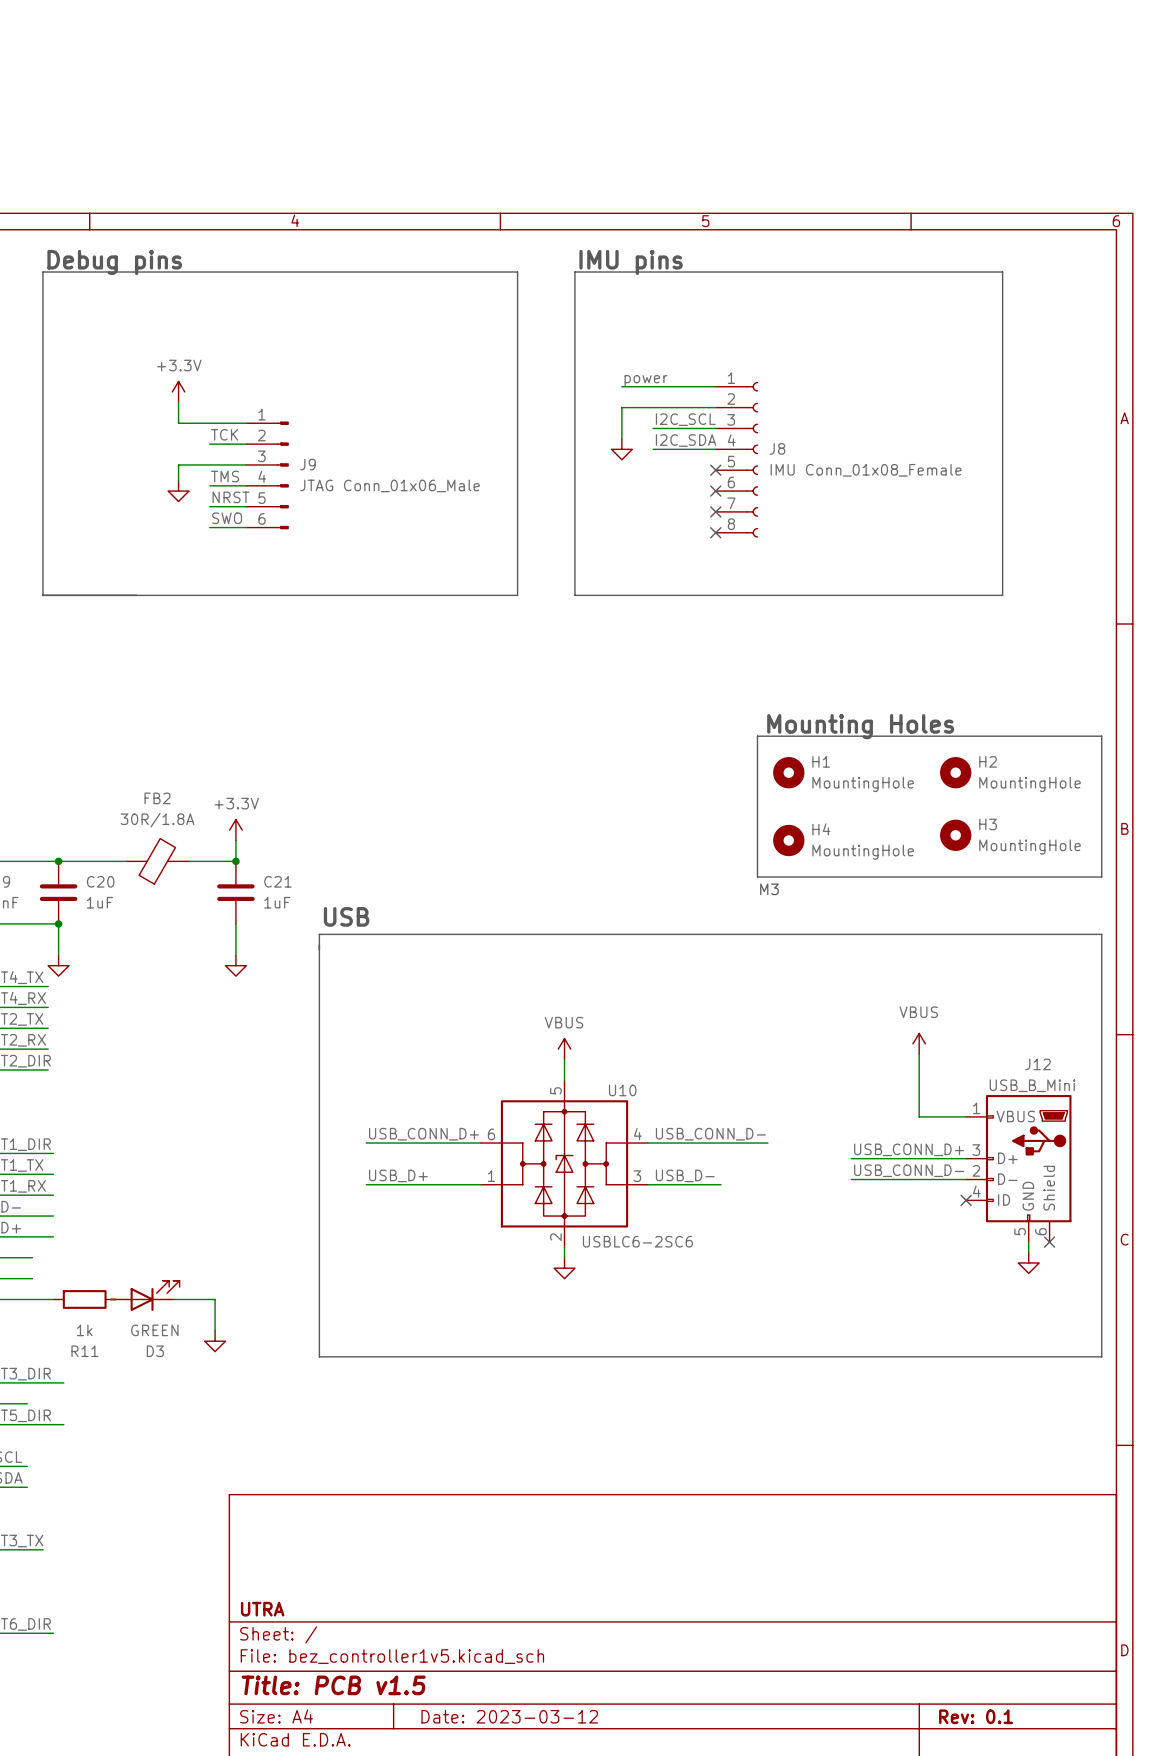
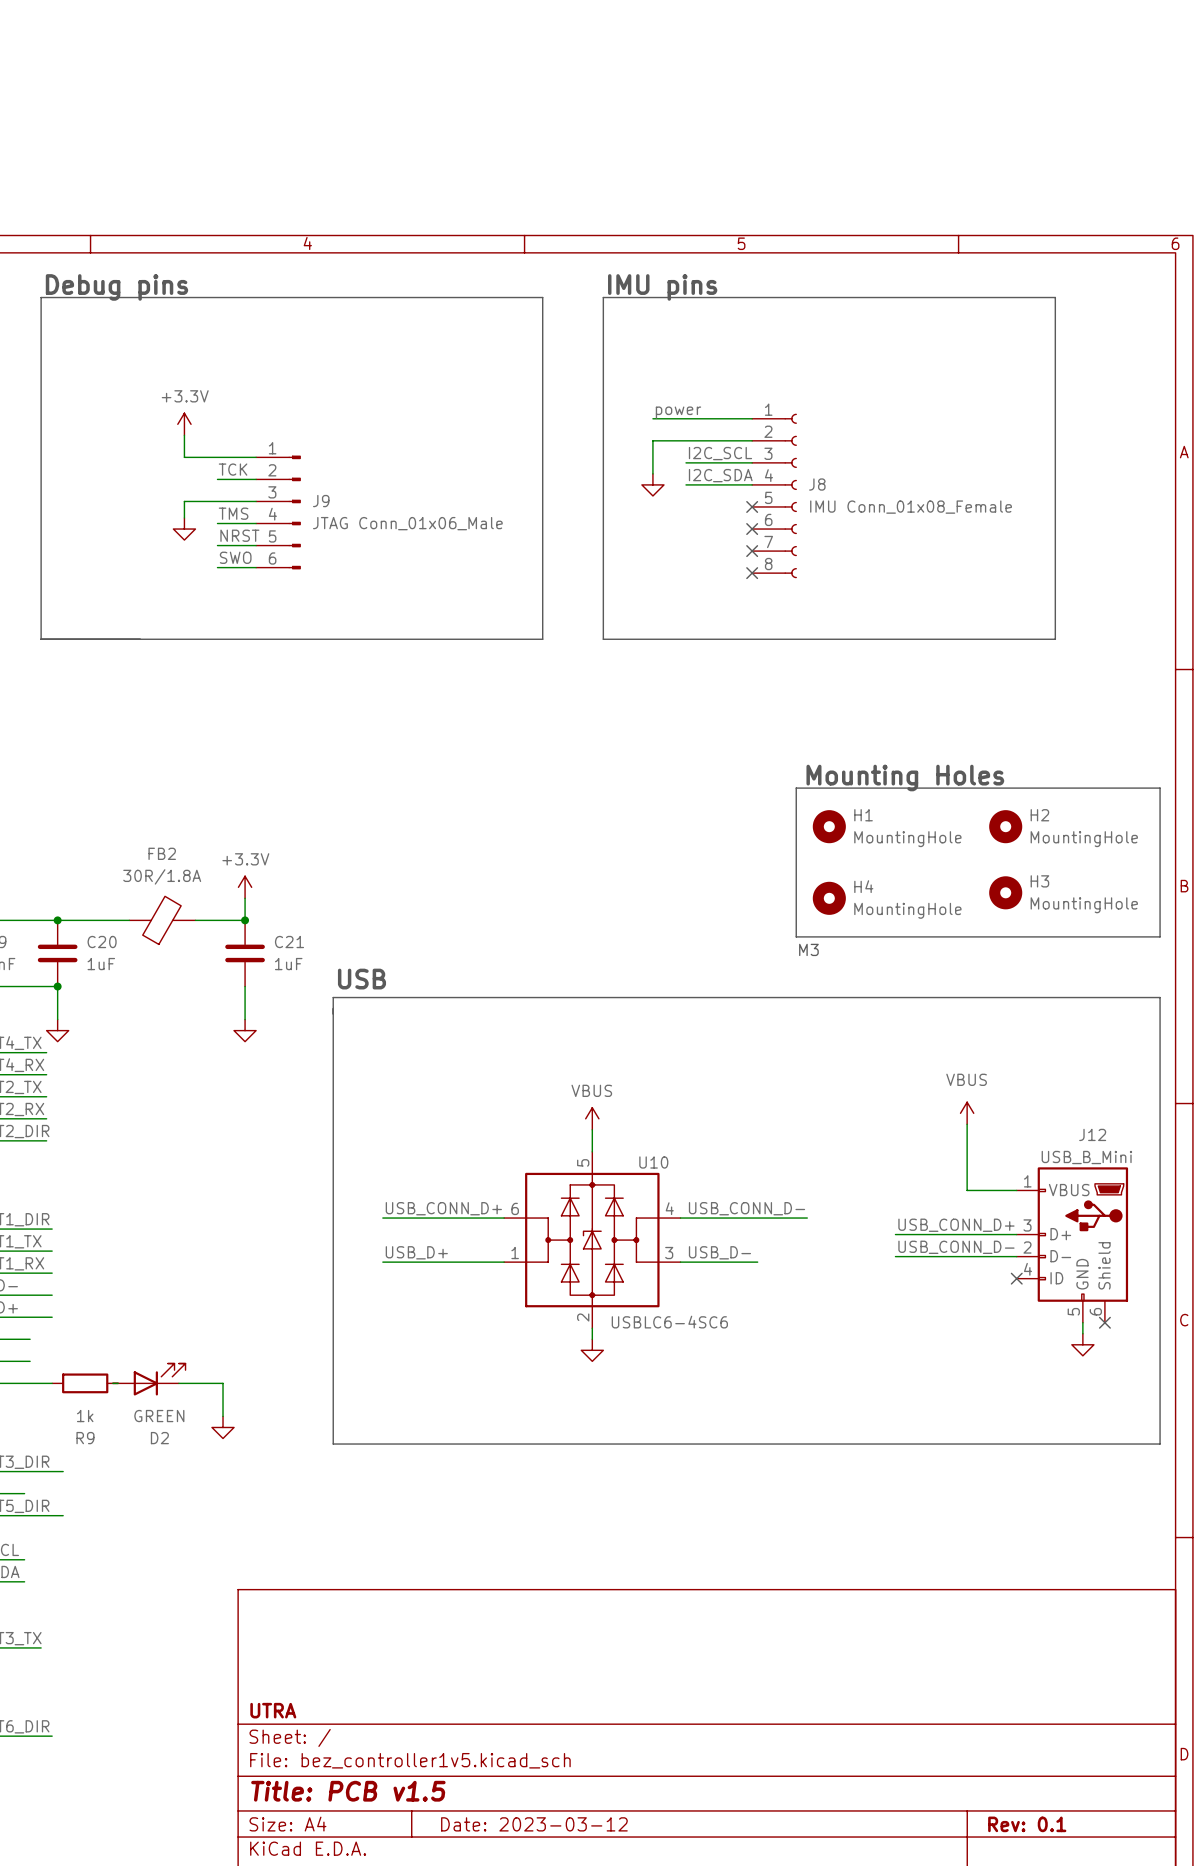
U10 value: USBLC6-2SC6 (637, 1241) -> USBLC6-4SC6 (669, 1322)
R11 name: R11 (84, 1351) -> R9 (85, 1438)
D3 name: D3 (155, 1351) -> D2 (159, 1438)

